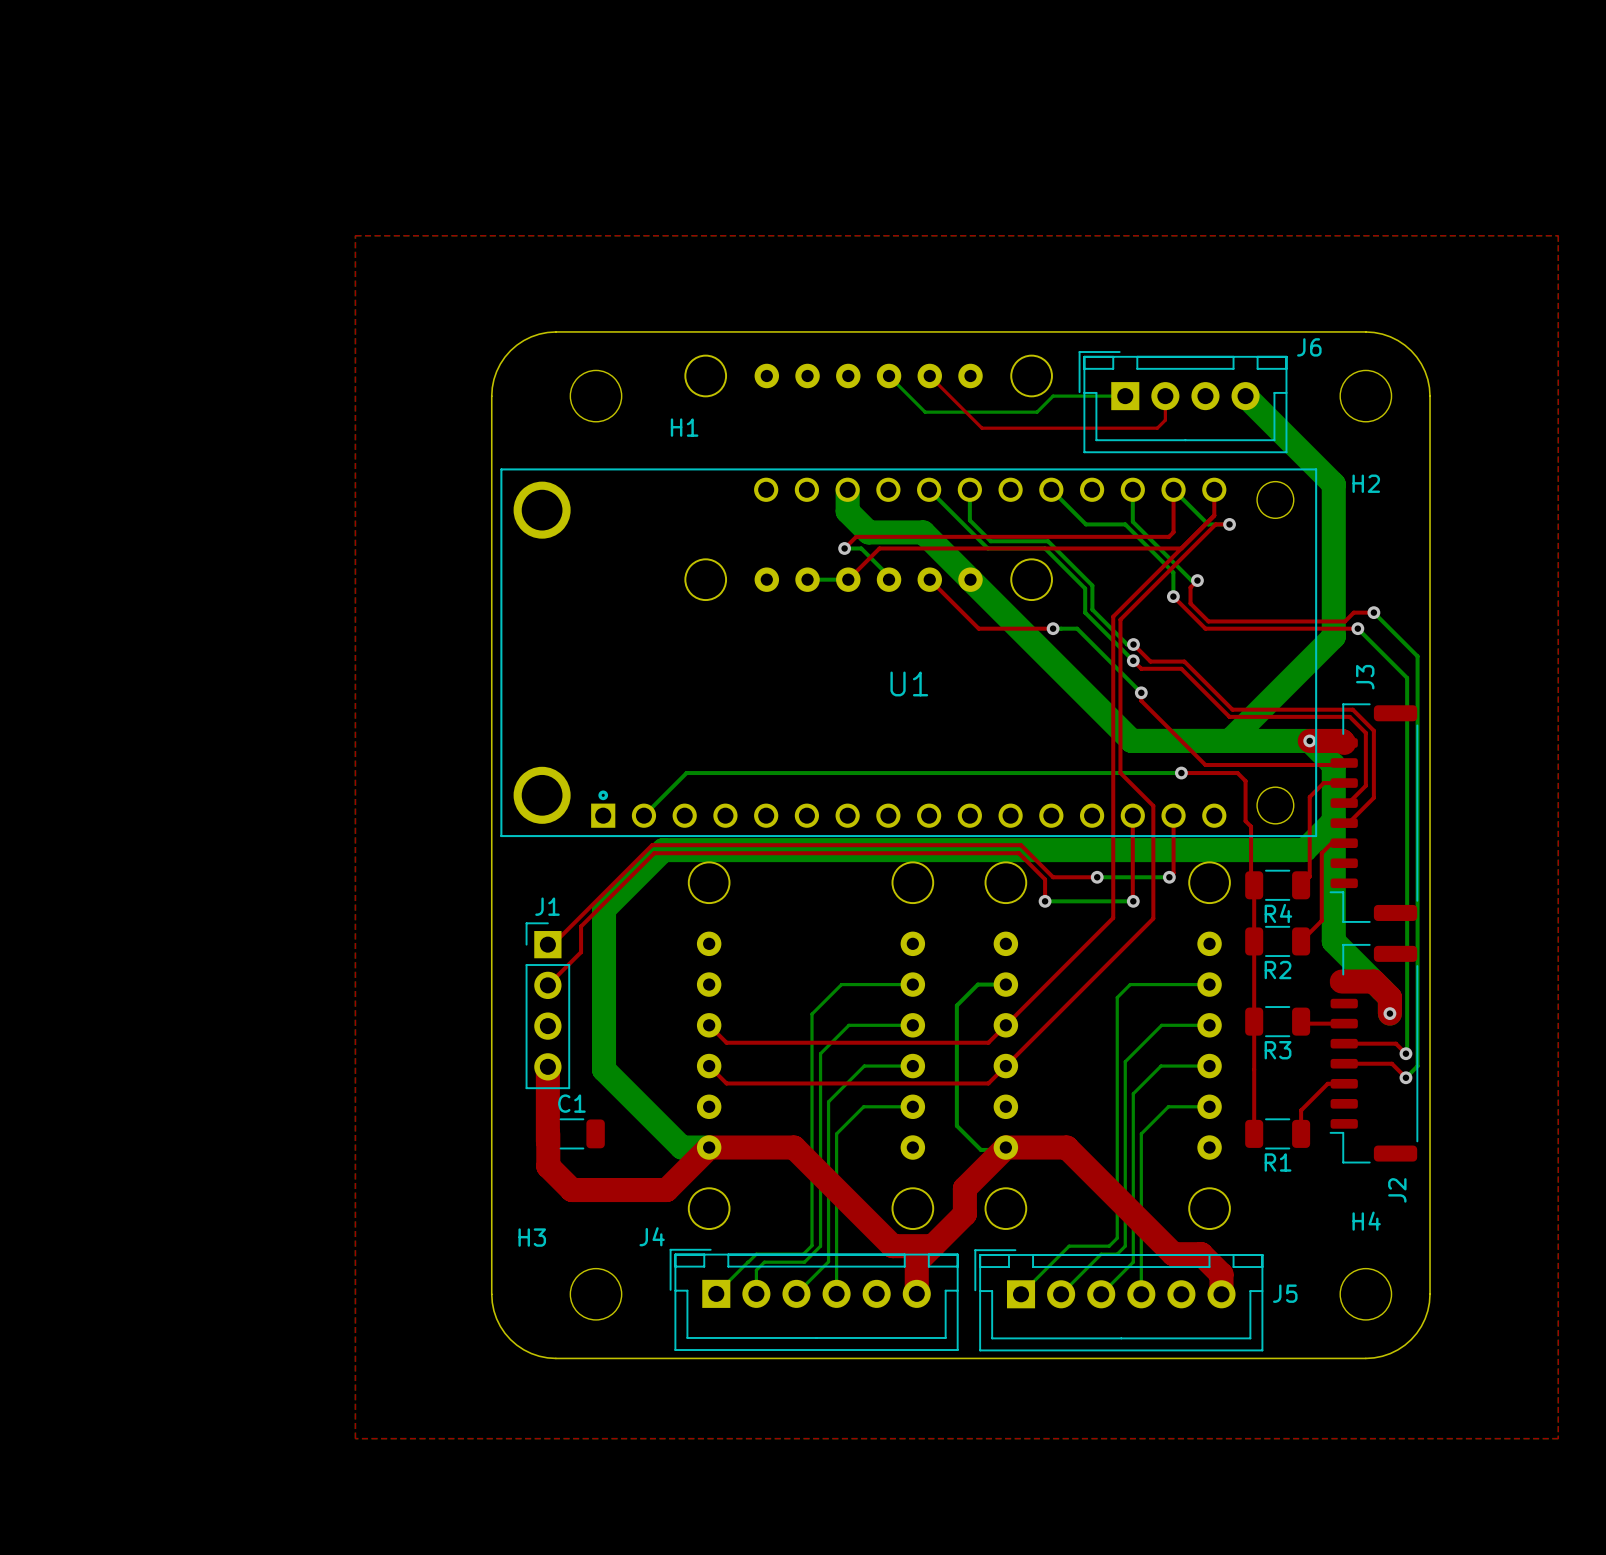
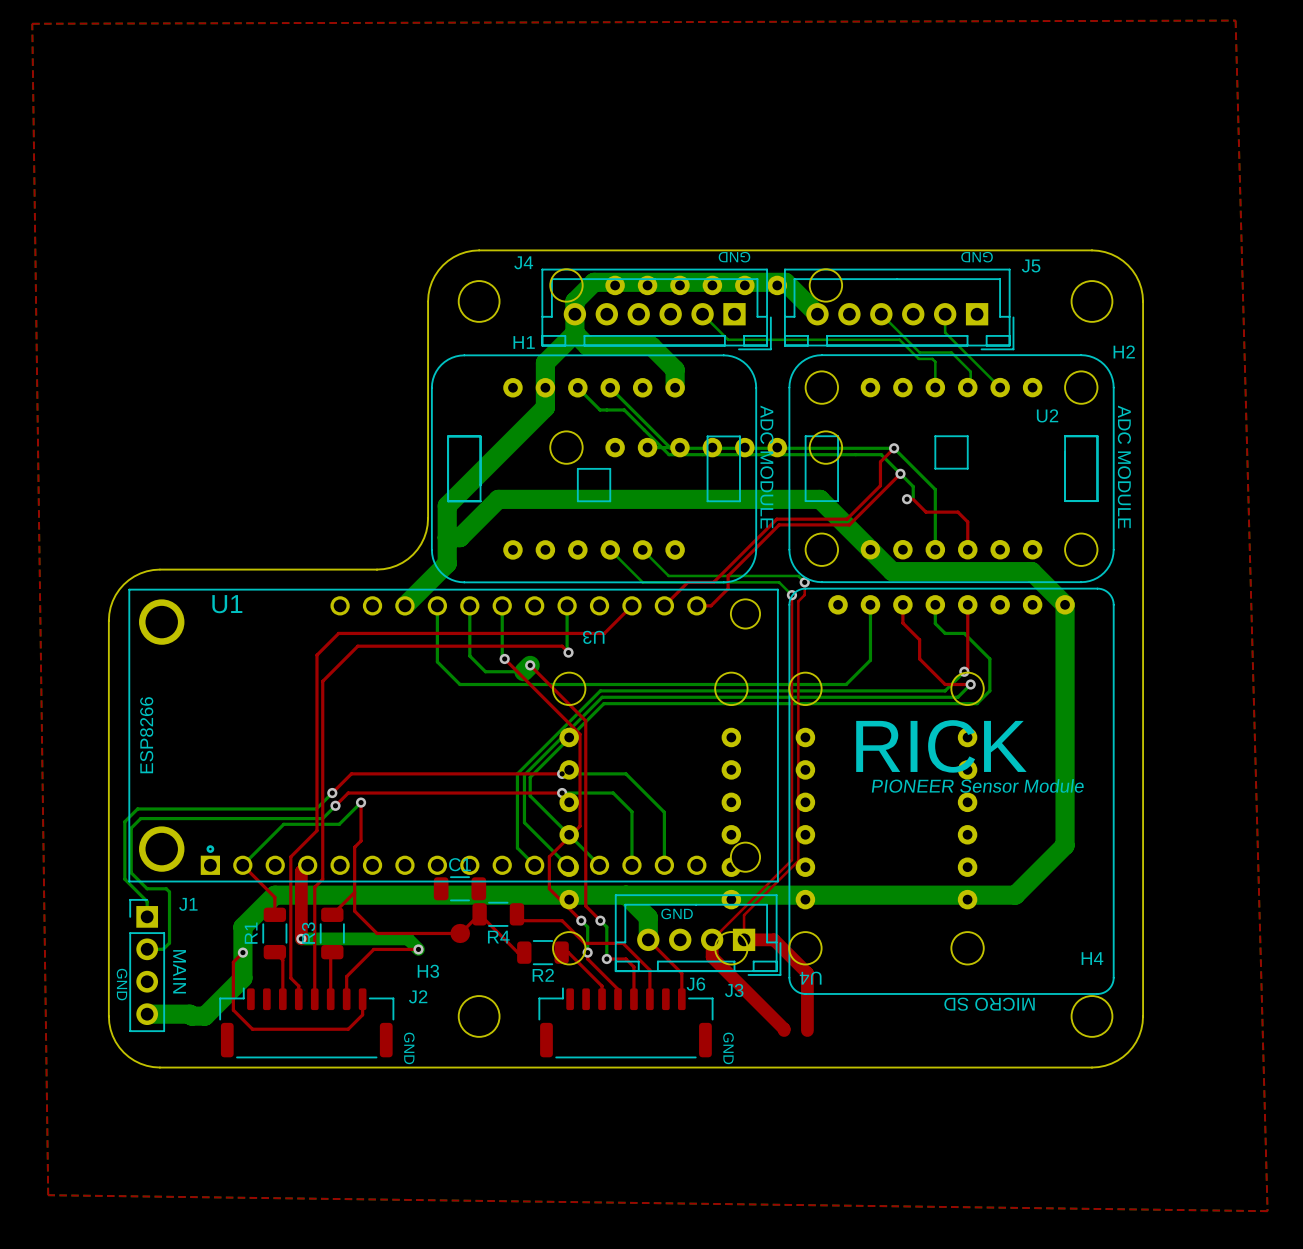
top zone outline: (355, 235) (355, 1438) (1558, 1438) (1558, 235) (355, 235) -> (1235, 20) (32, 23) (48, 1195) (1267, 1211) (1235, 20)
board edge: (596, 331) (547, 332) (523, 340) (510, 350) (500, 364) (493, 379) (491, 396) (492, 1302) (500, 1326) (516, 1345) (539, 1356) (555, 1358) -> (479, 250) (465, 252) (448, 260) (434, 275) (429, 288) (428, 301) (428, 518) (424, 538) (413, 554) (396, 565) (376, 569) (159, 569) (146, 571) (128, 580) (119, 589) (110, 607) (108, 620) (108, 1016) (110, 1029) (119, 1047) (134, 1060) (146, 1065) (159, 1067) (447, 1067)
text: none -> GND (734, 257)
text: none -> GND (977, 257)
J6 name position: J6 (1309, 347) -> J6 (695, 984)
bottom track: (889, 375) (925, 412) (1037, 412) (1053, 396) (1125, 396) -> none
top track: (929, 375) (981, 428) (1157, 428) (1165, 420) (1165, 396) -> none
bottom track: (1245, 396) (1333, 484) (1333, 636) (1229, 740) -> none
J6 rotation: 0° (1183, 402) -> 180° (698, 935)
J6 position: (1183, 402) -> (698, 935)
bottom track: none -> (702, 314) (728, 339) (899, 339) (918, 358) (932, 358) (935, 361) (935, 387)
bottom track: none -> (817, 314) (785, 282) (594, 282) (574, 301) (574, 333)
bottom track: none -> (881, 314) (919, 352) (951, 352) (970, 371) (970, 384) (967, 387)
bottom track: none -> (945, 314) (945, 332) (1000, 387)
H1 name position: H1 (684, 427) -> H1 (524, 342)
bottom track: none -> (574, 333) (587, 346) (651, 346) (675, 369) (675, 387)
bottom track: none -> (574, 333) (545, 362) (545, 407) (447, 505) (447, 563) (404, 605)
H2 name position: H2 (1366, 483) -> H2 (1124, 351)
bottom track: (847, 489) (847, 511) (868, 532) (923, 532) (1131, 740) (1309, 740) (1333, 765) (1333, 941) (1389, 997) (1389, 1013) -> none
bottom track: (929, 489) (987, 548) (1045, 548) (1085, 588) (1085, 612) (1133, 660) -> none
bottom track: (969, 489) (969, 520) (990, 541) (1048, 541) (1092, 585) (1092, 609) (1127, 644) (1133, 644) -> none
bottom track: (1051, 489) (1085, 524) (1125, 524) (1173, 572) (1173, 596) -> none
bottom track: (1132, 489) (1132, 521) (1191, 580) (1197, 580) -> none
top track: (1173, 489) (1173, 532) (1168, 536) (856, 536) (844, 548) -> none
bottom track: (1173, 489) (1208, 524) (1229, 524) -> none
top track: (1214, 489) (1214, 515) (1113, 616) (1113, 917) (988, 1042) (726, 1042) (709, 1025) -> none
bottom track: none -> (577, 387) (600, 409) (624, 409) (669, 454) (881, 454) (913, 486) (913, 499)
bottom track: none -> (610, 387) (670, 448) (894, 448) (935, 489) (935, 549)
top track: (1229, 524) (1215, 524) (1120, 619) (1120, 773) (1153, 805) (1153, 918) (988, 1083) (726, 1083) (709, 1066) -> none
via: (1229, 524) -> none
bottom track: (844, 548) (861, 548) (889, 576) (889, 579) -> none
via: (844, 548) -> none
top track: (1181, 548) (879, 548) (848, 579) -> none
top track: (929, 579) (978, 628) (1053, 628) -> none
top track: none -> (894, 448) (880, 461) (880, 485) (847, 519) (776, 519) (713, 582) (687, 582) (664, 605)
via: none -> (894, 448)
top track: (1197, 580) (1190, 587) (1190, 603) (1208, 621) (1345, 621) (1353, 612) (1373, 612) -> none
via: (1197, 580) -> none
top track: (1173, 596) (1205, 628) (1357, 628) -> none
via: (1173, 596) -> none
text: none -> ADC MODULE (766, 467)
text: none -> ADC MODULE (1124, 467)
U3: none -> (594, 468)
U2: none -> (951, 468)
top track: none -> (900, 473) (849, 524) (779, 524) (728, 575) (728, 588) (711, 605) (696, 605)
via: none -> (900, 473)
bottom track: (1373, 612) (1417, 656) (1417, 1066) (1405, 1077) -> none
via: (1373, 612) -> none
bottom track: (1053, 628) (1077, 628) (1141, 692) -> none
via: (1053, 628) -> none
bottom track: (1357, 628) (1407, 677) (1405, 1053) -> none
via: (1357, 628) -> none
top track: (1133, 644) (1150, 661) (1184, 661) (1232, 709) (1352, 709) (1373, 730) (1373, 797) (1348, 823) (1344, 823) -> none
top track: none -> (913, 499) (926, 512) (957, 512) (967, 521) (967, 549)
U1 position: (908, 652) -> (453, 735)
top track: (1133, 660) (1141, 668) (1181, 668) (1229, 716) (1349, 716) (1365, 732) (1365, 785) (1348, 803) (1344, 803) -> none
via: (1133, 660) -> none
J3 name position: J3 (1365, 677) -> J3 (734, 990)
U1 name position: U1 (909, 683) -> U1 (227, 604)
bottom track: none -> (447, 537) (459, 537) (498, 499) (820, 499) (892, 571) (1031, 571) (1065, 604) (1065, 845) (1015, 895) (274, 895) (242, 927) (242, 978) (204, 1016) (147, 1014)
top track: (1141, 692) (1141, 700) (1205, 765) (1342, 765) (1344, 763) -> none
via: (1141, 692) -> none
bottom track: none -> (610, 549) (642, 582) (779, 582) (791, 595)
bottom track: none -> (642, 549) (668, 575) (798, 575) (804, 582)
top track: (1309, 740) (1342, 740) (1344, 742) -> none
via: (1309, 740) -> none
top track: none -> (804, 582) (804, 595) (798, 601) (798, 860) (744, 915) (744, 939) (774, 939) (807, 973) (807, 1030)
via: none -> (804, 582)
top track: none -> (791, 595) (791, 860) (712, 939) (712, 957) (784, 1030)
via: none -> (791, 595)
top track: (1181, 773) (1237, 773) (1245, 781) (1245, 821) (1251, 826) (1251, 882) (1254, 885) (1254, 1133) -> none
bottom track: (1181, 773) (686, 773) (643, 815) -> none
via: (1181, 773) -> none
bottom track: none -> (870, 604) (870, 660) (846, 684) (459, 684) (437, 661) (437, 605)
top track: none -> (902, 604) (902, 623) (919, 639) (919, 658) (945, 684) (970, 684)
bottom track: none -> (935, 604) (935, 623) (945, 633) (964, 633) (989, 658) (989, 690) (977, 703) (906, 703)
top track: none -> (967, 604) (967, 668) (964, 671)
bottom track: none -> (502, 605) (502, 656) (504, 658)
bottom track: none -> (567, 605) (568, 652)
top track: none -> (631, 605) (604, 633) (338, 633) (316, 655) (316, 830) (290, 856) (290, 978) (298, 986) (298, 999)
top track: (1344, 783) (1323, 783) (1309, 797) (1309, 876) (1301, 885) -> none
J3 rotation: 0° (1373, 813) -> 90° clockwise (625, 1022)
J3 position: (1373, 813) -> (625, 1022)
top track: (1132, 815) (1133, 901) -> none
top track: (1173, 815) (1173, 873) (1169, 877) -> none
bottom track: (1333, 821) (1304, 850) (663, 850) (660, 853) -> none
top track: none -> (568, 652) (562, 646) (357, 646) (322, 681) (322, 879) (314, 887) (314, 999)
via: none -> (568, 652)
top track: (1344, 843) (1331, 843) (1321, 853) (1321, 920) (1301, 941) -> none
top track: none -> (504, 658) (580, 734) (580, 826) (549, 856) (549, 888) (581, 920)
via: none -> (504, 658)
top track: none -> (530, 665) (585, 720) (585, 906) (600, 920)
via: none -> (530, 665)
bottom track: (652, 861) (604, 909) (604, 1069) (681, 1147) (709, 1147) -> (523, 671) (485, 671) (469, 656) (469, 605)
bottom track: none -> (964, 671) (945, 690) (600, 690) (517, 773) (517, 848) (534, 865)
via: none -> (964, 671)
top track: (1097, 877) (1053, 877) (1021, 845) (652, 845) (552, 944) (547, 944) -> none
bottom track: (1097, 877) (1169, 877) -> none
via: (1097, 877) -> none
via: (1169, 877) -> none
bottom track: none -> (970, 684) (957, 697) (602, 697) (524, 774) (524, 822) (567, 865)
via: none -> (970, 684)
R4 position: (1277, 885) -> (498, 914)
top track: (1045, 901) (1045, 879) (1018, 853) (654, 853) (581, 926) (581, 952) (547, 985) -> none
bottom track: none -> (836, 703) (603, 703) (530, 777) (530, 795) (599, 865)
via: (1045, 901) -> none
via: (1133, 901) -> none
J1 name position: J1 (547, 906) -> J1 (188, 904)
text: none -> ESP8266 (146, 735)
R2 position: (1277, 941) -> (542, 952)
text: none -> RICK (941, 746)
top track: (1341, 981) (1373, 981) (1389, 997) (1389, 1013) -> none
bottom track: (912, 984) (841, 984) (812, 1014) (812, 1245) (803, 1254) (756, 1254) (716, 1293) -> none
bottom track: (1005, 984) (977, 984) (956, 1005) (956, 1125) (980, 1149) (1003, 1149) (1005, 1147) -> none
bottom track: (1209, 984) (1130, 984) (1117, 997) (1117, 1238) (1109, 1246) (1069, 1246) (1021, 1294) -> none
top track: none -> (562, 773) (351, 773) (332, 793)
bottom track: none -> (562, 773) (625, 773) (664, 812) (664, 865)
via: none -> (562, 773)
text: none -> PIONEER Sensor Module (978, 785)
J1 position: (547, 1005) -> (147, 965)
U4: none -> (951, 791)
bottom track: none -> (332, 793) (316, 808) (137, 808) (124, 821) (124, 879) (147, 901) (147, 916)
via: none -> (332, 793)
top track: none -> (562, 793) (348, 793) (335, 805)
bottom track: none -> (562, 793) (613, 793) (631, 811) (631, 865)
via: none -> (562, 793)
via: (1389, 1013) -> none
R3 rotation: 0° (1277, 1021) -> 90° clockwise (332, 933)
R3 position: (1277, 1021) -> (332, 933)
top track: (1301, 1021) (1303, 1023) (1344, 1023) -> none
top track: none -> (361, 802) (361, 840) (354, 847) (354, 911) (376, 933) (460, 933) (479, 914) (517, 952) (524, 952)
bottom track: none -> (361, 802) (339, 824) (283, 824) (242, 865)
via: none -> (361, 802)
bottom track: (912, 1025) (848, 1025) (820, 1053) (820, 1246) (804, 1262) (764, 1262) (756, 1270) (756, 1293) -> none
bottom track: (1209, 1025) (1161, 1025) (1125, 1061) (1125, 1246) (1117, 1254) (1101, 1254) (1061, 1294) -> none
bottom track: none -> (335, 805) (322, 818) (140, 818) (131, 828) (131, 872) (147, 888) (166, 888) (169, 891) (169, 943) (163, 949) (147, 949)
via: none -> (335, 805)
top track: (1344, 1043) (1395, 1043) (1405, 1053) -> none
J2 rotation: 0° (1373, 1053) -> 90° clockwise (306, 1022)
J2 position: (1373, 1053) -> (306, 1022)
via: (1405, 1053) -> none
top track: (1344, 1063) (1391, 1063) (1405, 1077) -> none
top track: (547, 1066) (547, 1141) -> none
bottom track: (912, 1066) (864, 1066) (828, 1101) (828, 1261) (796, 1293) -> none
bottom track: (1209, 1066) (1161, 1066) (1133, 1093) (1133, 1262) (1101, 1294) -> none
via: (1405, 1077) -> none
top track: (1344, 1083) (1327, 1083) (1301, 1110) (1301, 1133) -> none
top track: none -> (242, 865) (274, 897) (274, 914)
top track: none -> (307, 865) (301, 871) (301, 938)
bottom track: (912, 1106) (863, 1106) (836, 1133) (836, 1293) -> none
bottom track: (1209, 1106) (1168, 1106) (1141, 1133) (1141, 1294) -> none
top track: (548, 1133) (548, 1166) (571, 1190) -> none
R1 rotation: 0° (1277, 1133) -> 90° clockwise (274, 933)
R1 position: (1277, 1133) -> (274, 933)
top track: none -> (354, 892) (332, 914)
bottom track: none -> (625, 895) (648, 917) (648, 939)
top track: none -> (516, 914) (523, 920) (562, 920) (584, 943) (623, 943) (649, 970) (649, 999)
text: none -> GND (677, 913)
bottom track: none -> (581, 920) (587, 927) (587, 952)
via: none -> (581, 920)
bottom track: none -> (600, 920) (606, 927) (606, 959)
via: none -> (600, 920)
top track: (572, 1190) (666, 1190) (709, 1147) (794, 1147) (892, 1246) (932, 1246) -> none
J2 name position: J2 (1397, 1190) -> J2 (418, 996)
bottom track: none -> (301, 938) (407, 938) (418, 949)
via: none -> (301, 938)
top track: none -> (648, 939) (681, 973) (681, 999)
top track: none -> (418, 949) (373, 949) (346, 976) (346, 999)
via: none -> (418, 949)
top track: none -> (274, 952) (282, 960) (282, 999)
top track: none -> (332, 952) (330, 953) (330, 999)
top track: none -> (242, 952) (233, 962) (233, 1010) (252, 1029) (348, 1029) (362, 1014) (362, 999)
via: none -> (242, 952)
top track: none -> (561, 952) (568, 952) (602, 986) (602, 999)
top track: none -> (587, 952) (587, 959) (617, 989) (617, 999)
via: none -> (587, 952)
top track: none -> (606, 959) (625, 959) (633, 966) (633, 999)
via: none -> (606, 959)
text: none -> MAIN (179, 971)
text: none -> GND (122, 984)
text: none -> MICRO SD (989, 1004)
top track: (916, 1293) (916, 1262) (964, 1214) (964, 1188) (1005, 1147) (1066, 1147) (1173, 1254) (1201, 1254) (1221, 1274) (1221, 1294) -> none
J5 name position: J5 (1285, 1293) -> J5 (1031, 265)
J4 rotation: 0° (814, 1299) -> 180° (656, 309)
J4 position: (814, 1299) -> (656, 309)
J5 rotation: 0° (1118, 1300) -> 180° (899, 309)
J5 position: (1118, 1300) -> (899, 309)
text: none -> GND (409, 1048)
text: none -> GND (728, 1048)

